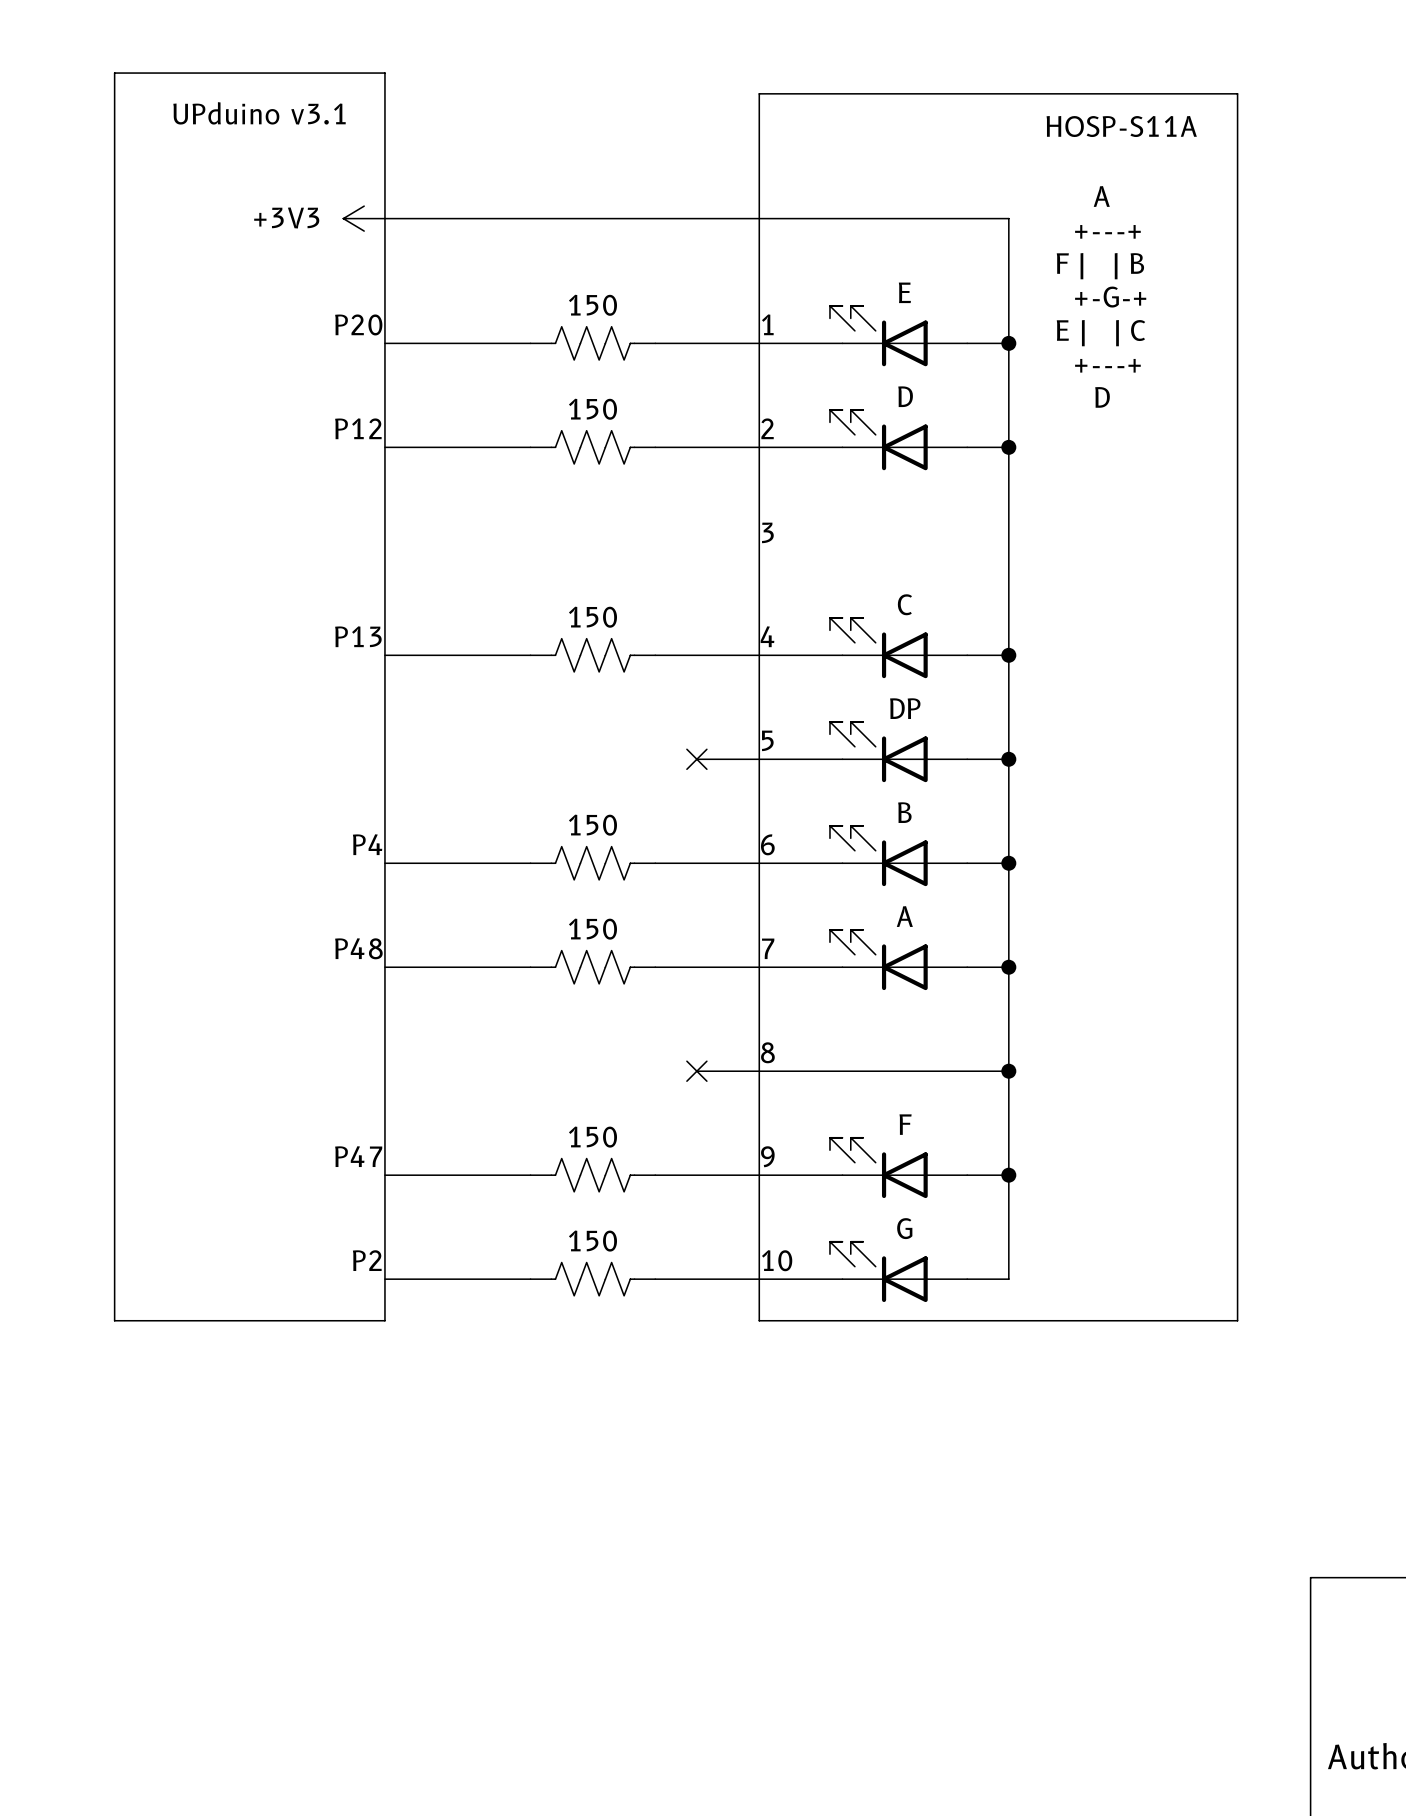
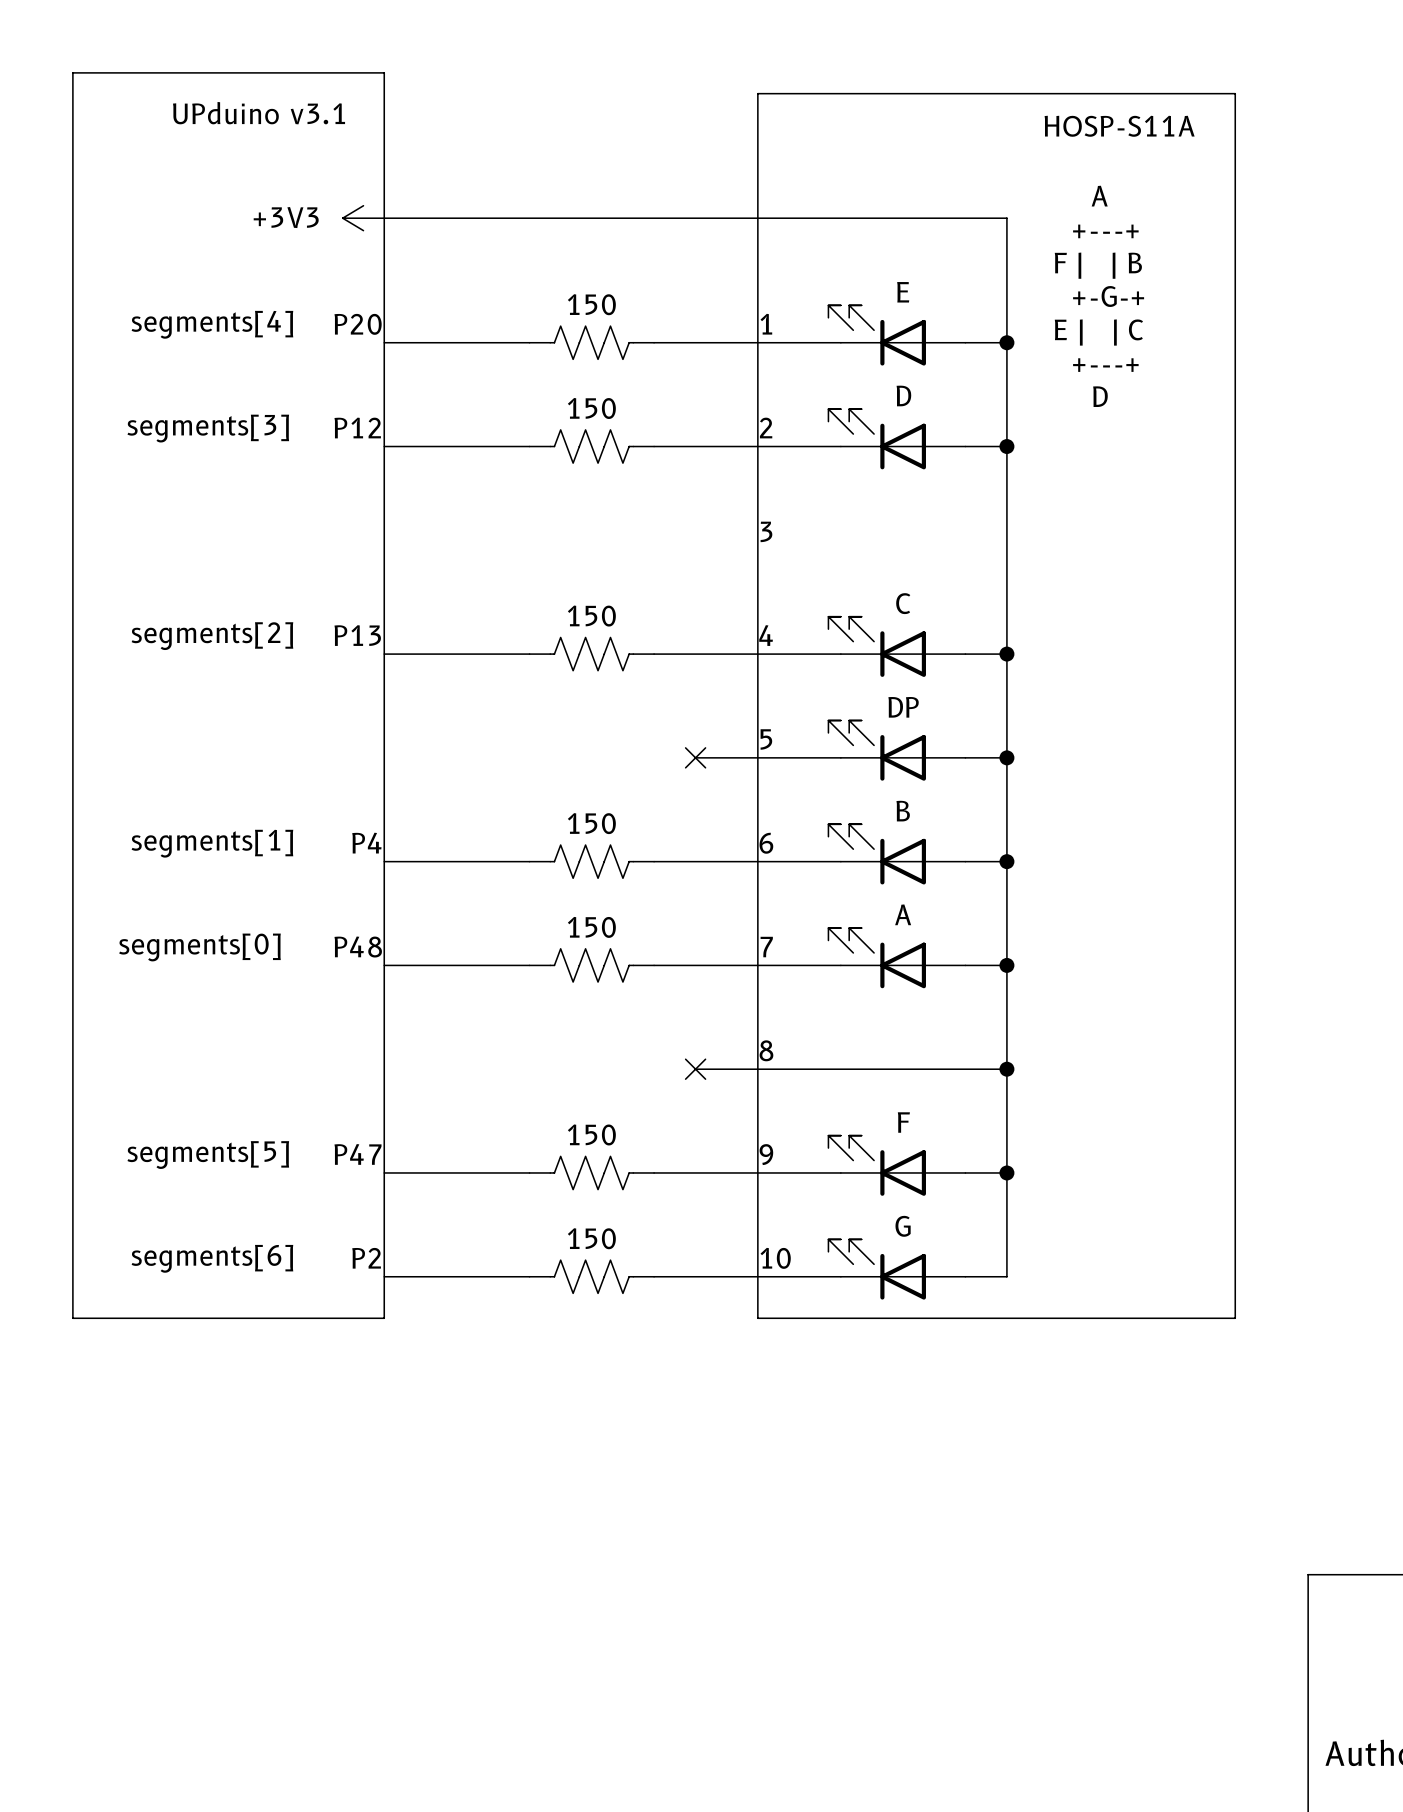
line: (114, 73) (114, 1320) -> (114, 72) (72, 72) (72, 1318) (114, 1318)
text: none -> segments[4] (212, 324)
text: none -> segments[3] (208, 428)
text: none -> segments[2] (212, 636)
text: none -> segments[1] (212, 843)
text: none -> segments[0] (199, 947)
text: none -> segments[5] (208, 1155)
text: none -> segments[6] (212, 1258)

